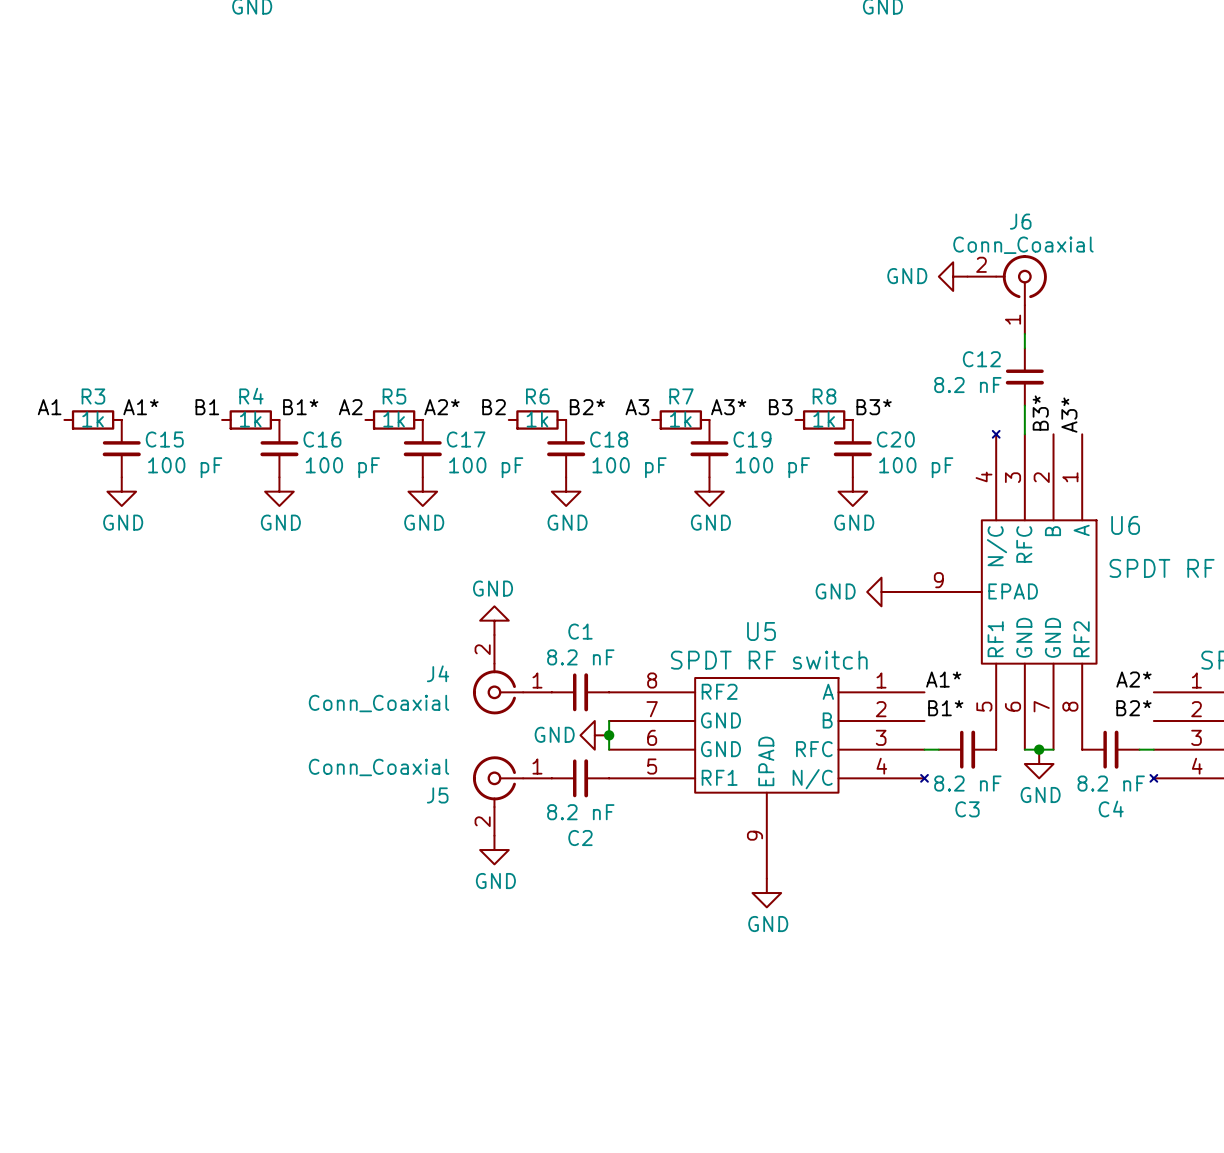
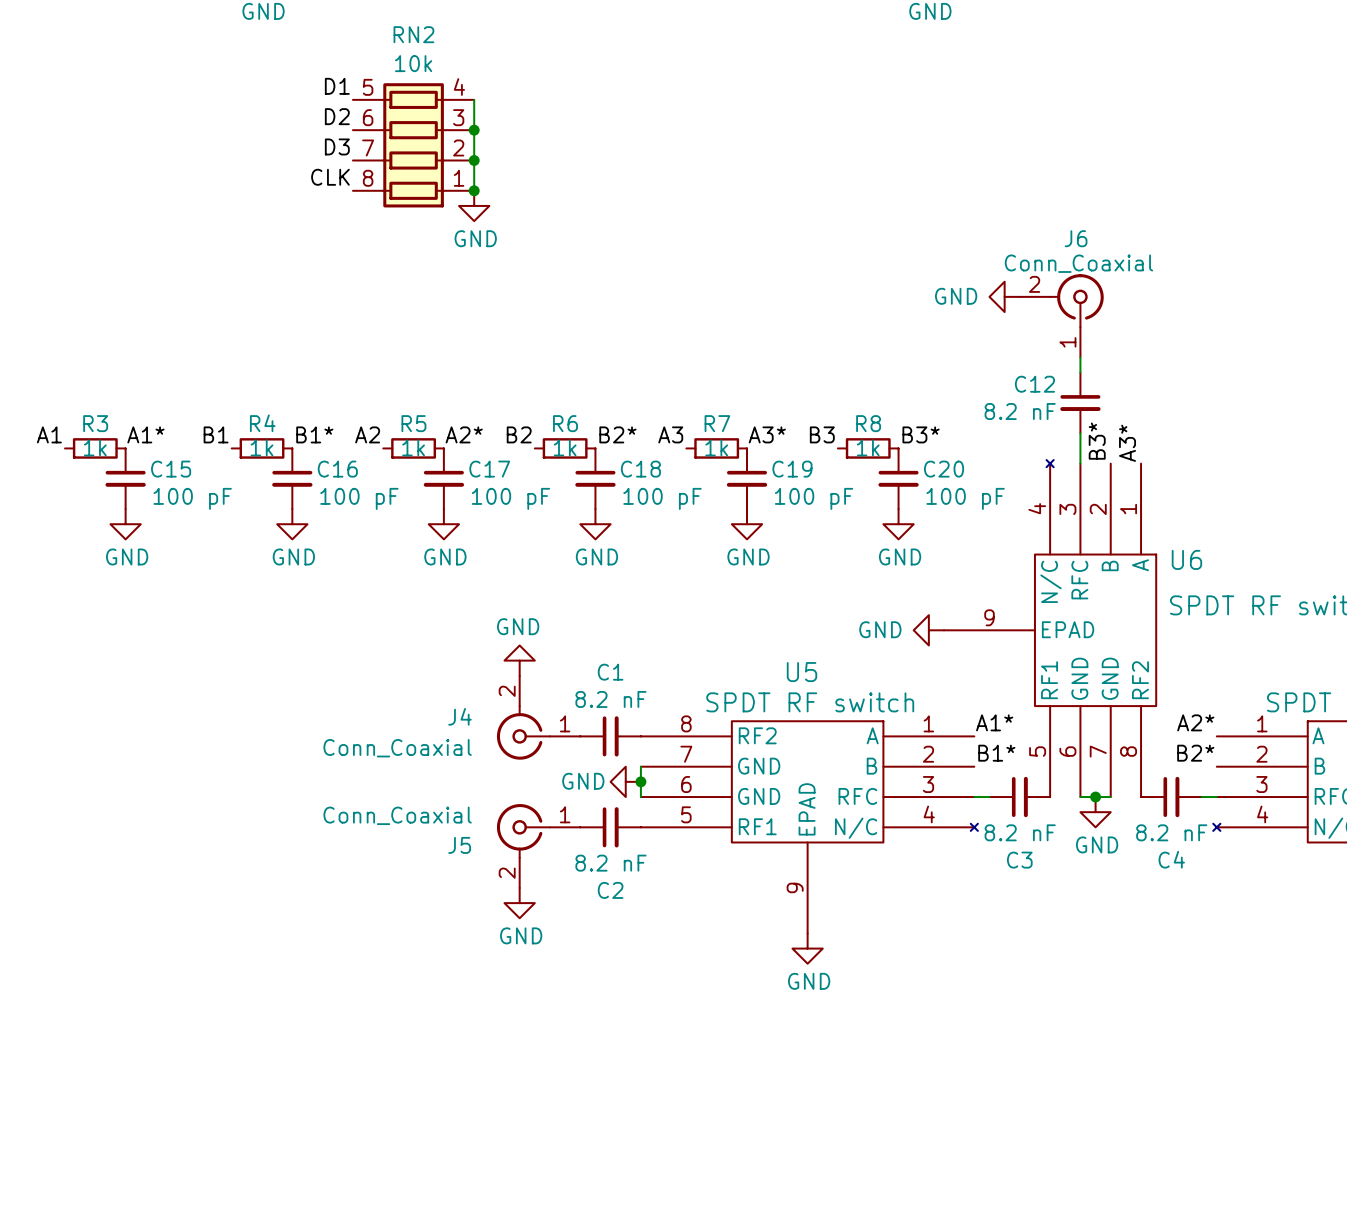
label: none -> D1 (337, 86)
wire: none -> (474, 99) (474, 190)
label: none -> D2 (337, 116)
junction: none -> (474, 130)
RN2: none -> 10k (413, 145)
label: none -> D3 (337, 146)
junction: none -> (474, 160)
label: none -> CLK (330, 177)
junction: none -> (474, 190)
power symbol: none -> GND (474, 205)

